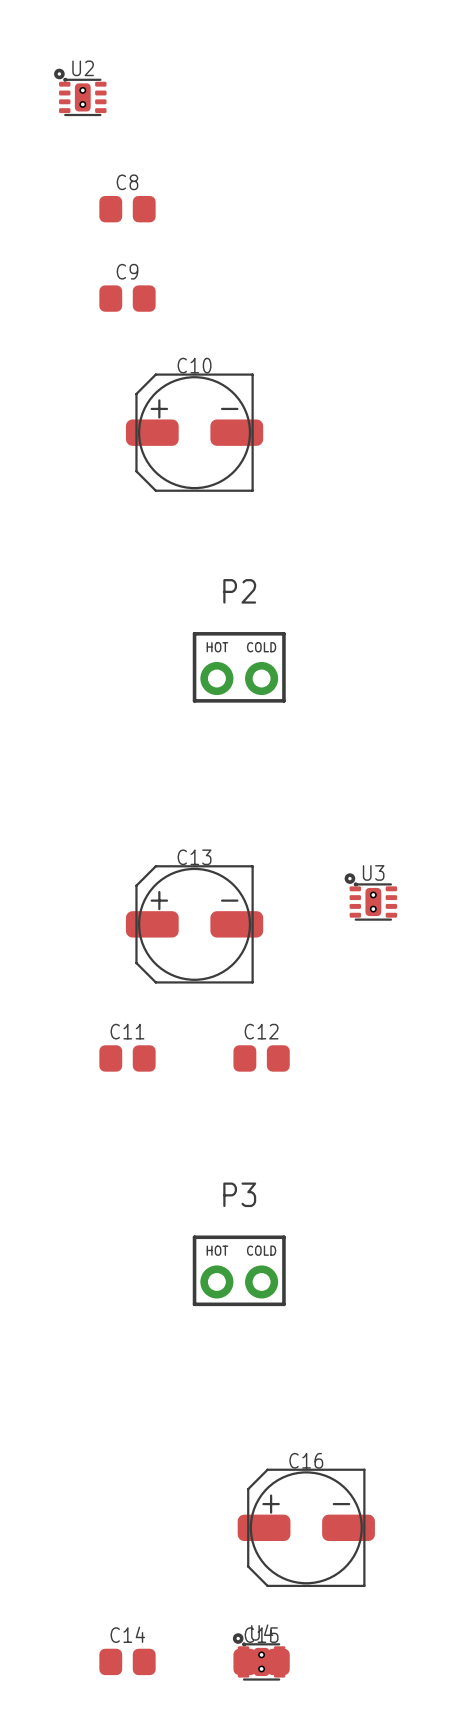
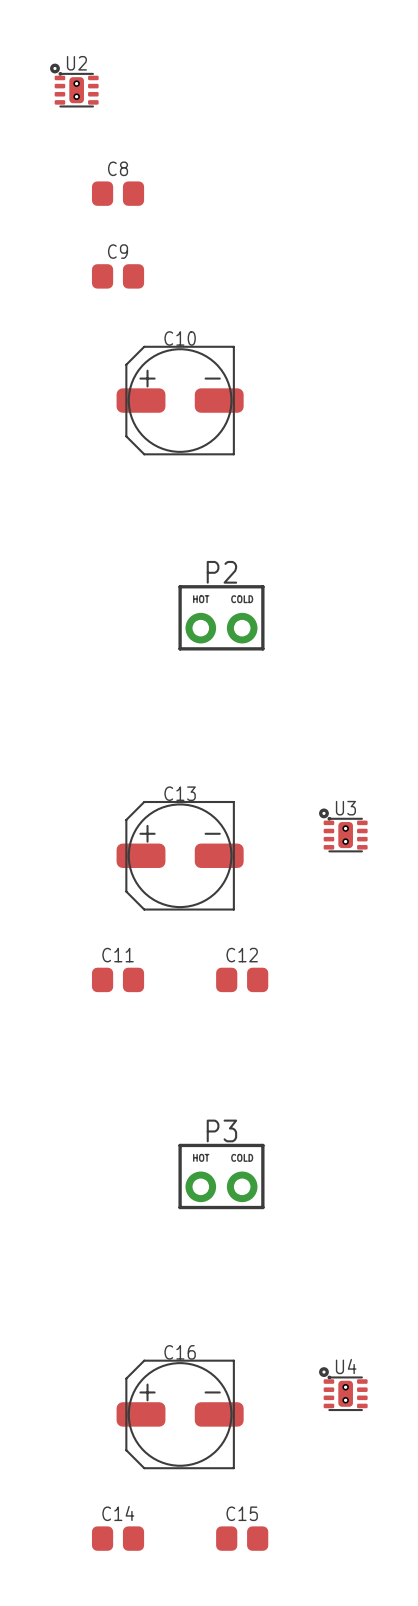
P2 footprint: [192, 632, 286, 703] -> [178, 585, 265, 651]
P3 footprint: [192, 1235, 286, 1307] -> [178, 1143, 265, 1210]
C16 position: (306, 1527) -> (180, 1414)
U4 position: (259, 1656) -> (343, 1389)

